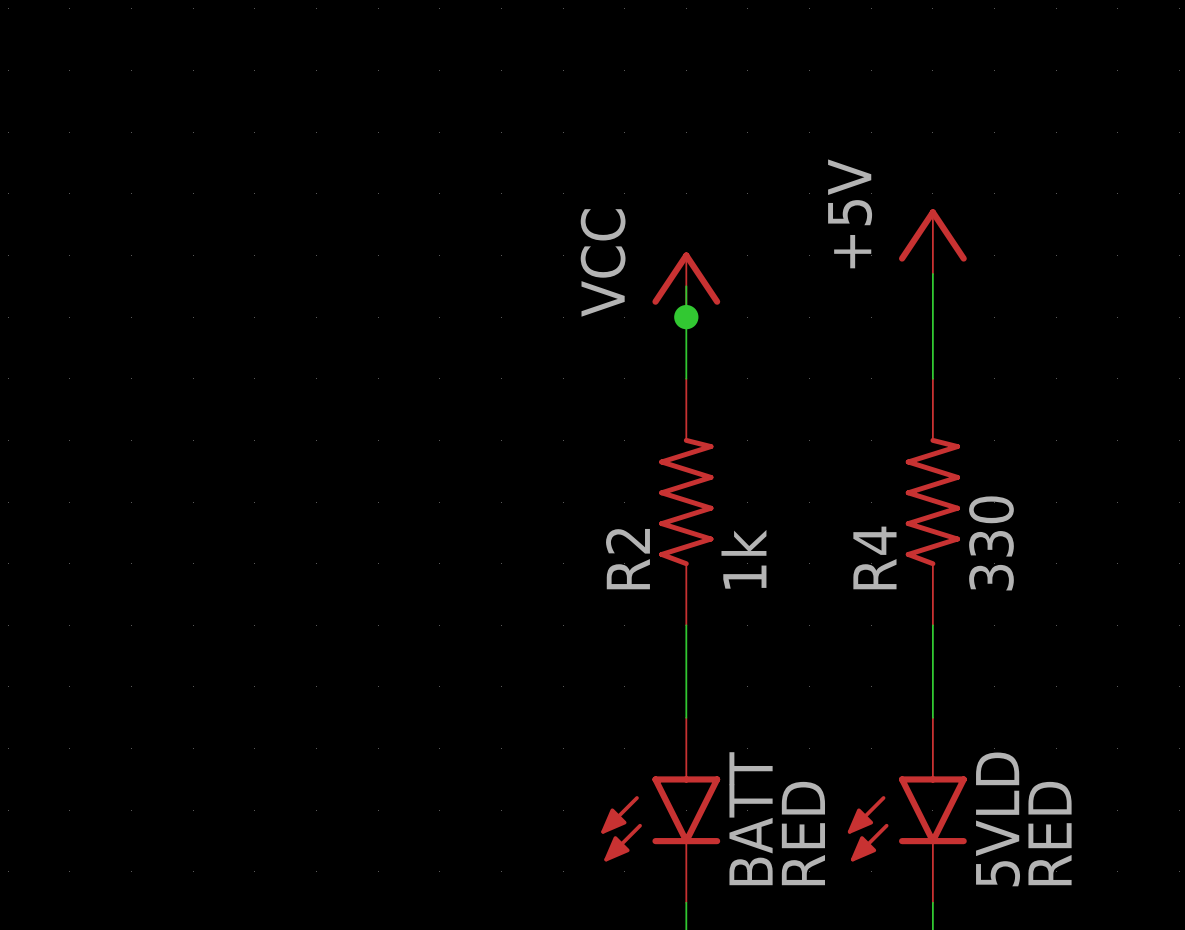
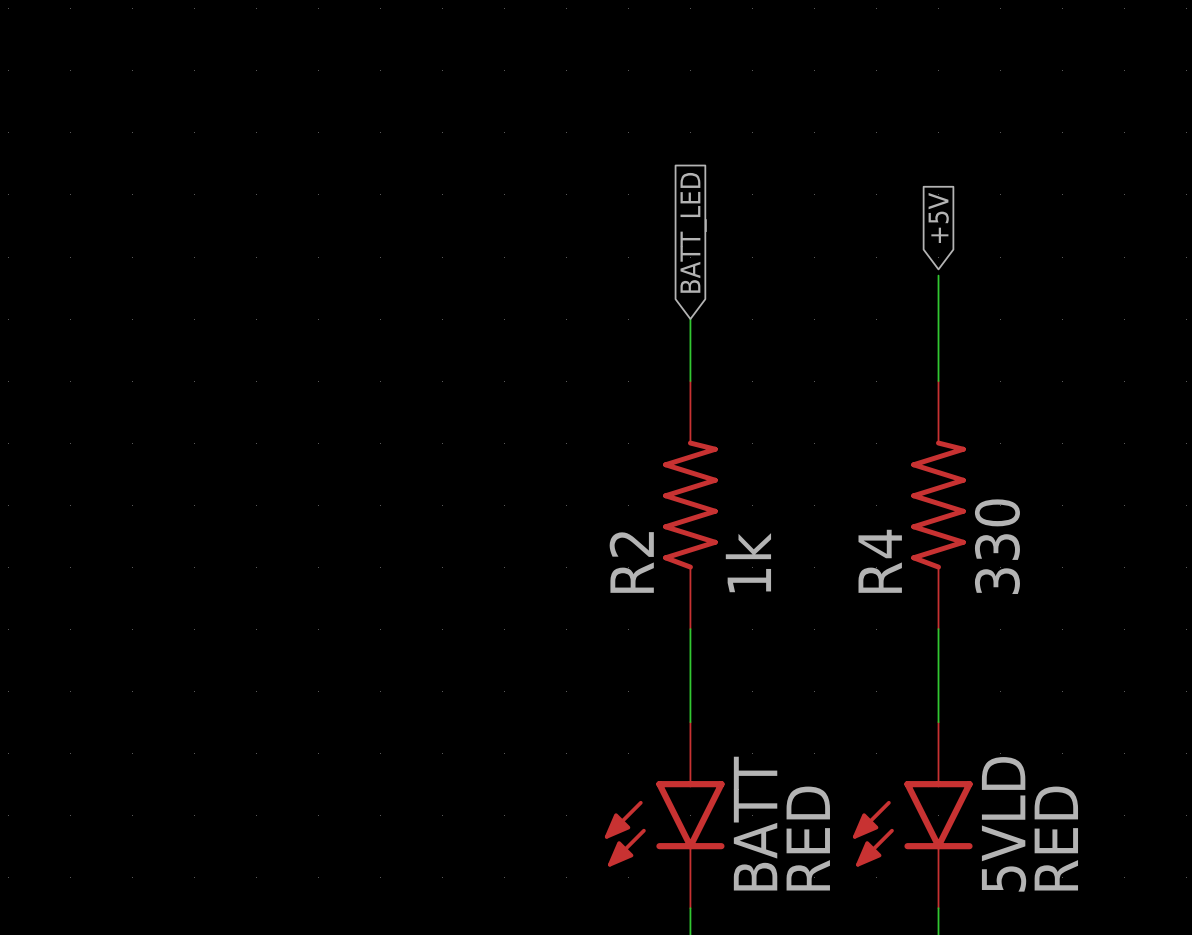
global label: none -> +5V (938, 217)
global label: none -> BATT_LED (693, 232)
power symbol: +5V (932, 241) -> none
power symbol: VCC (686, 284) -> none
wire: (686, 286) (686, 317) -> none
junction: (686, 317) -> none

